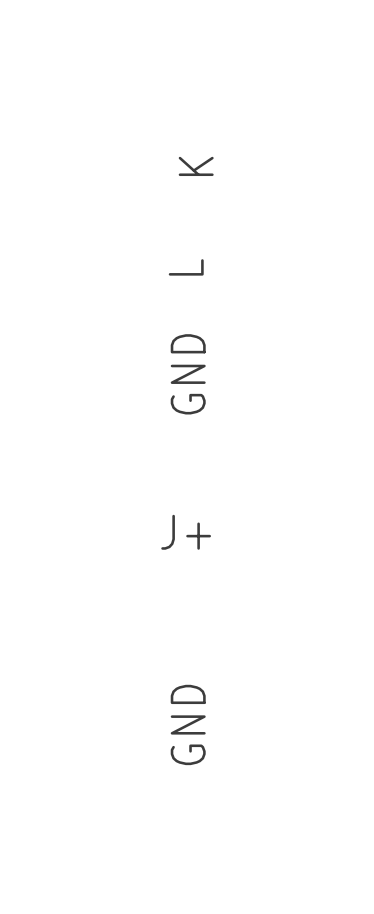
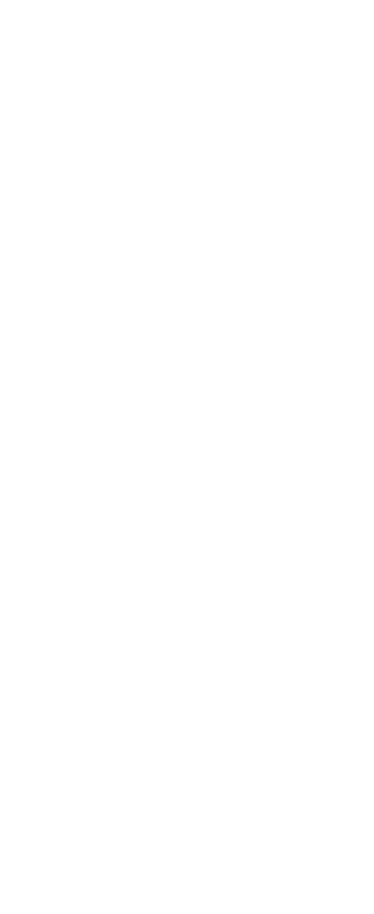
text: K (196, 166) -> none
text: L (186, 267) -> none
text: GND (188, 374) -> none
text: J+ (186, 532) -> none
text: GND (188, 724) -> none

